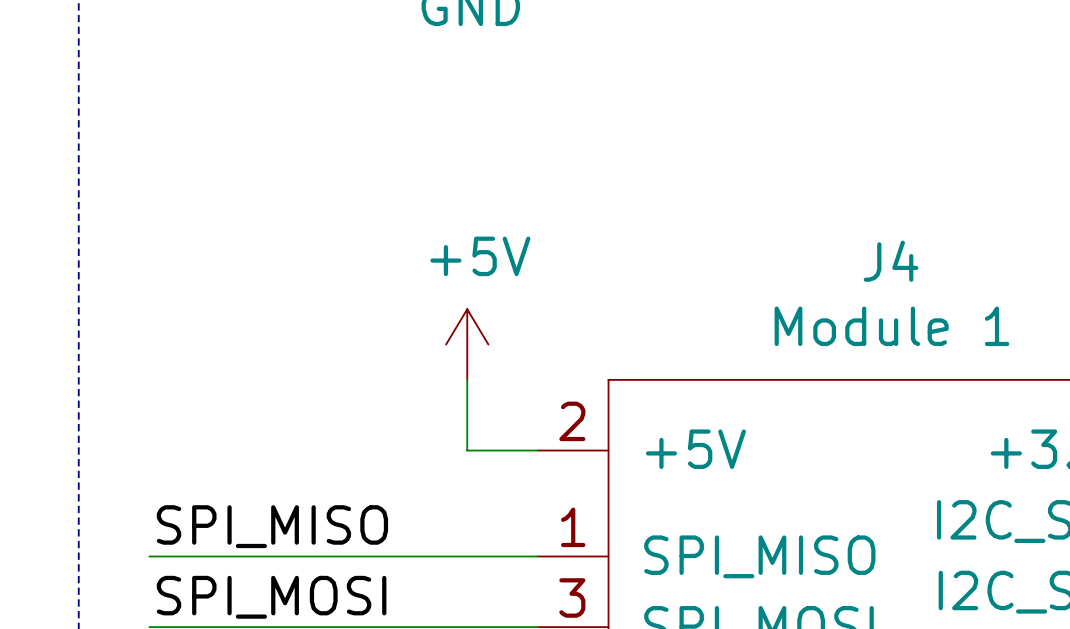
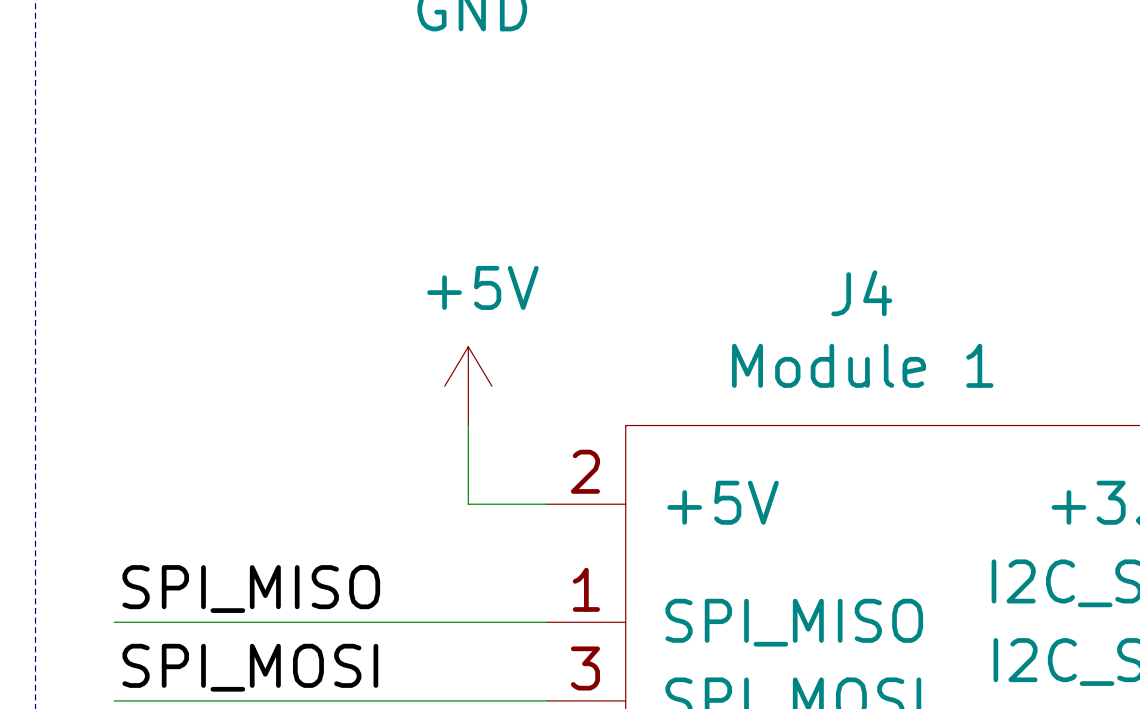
J4 name position: J4 (891, 261) -> J4 (861, 293)
J4 value position: Module 1 (891, 326) -> Module 1 (862, 365)

